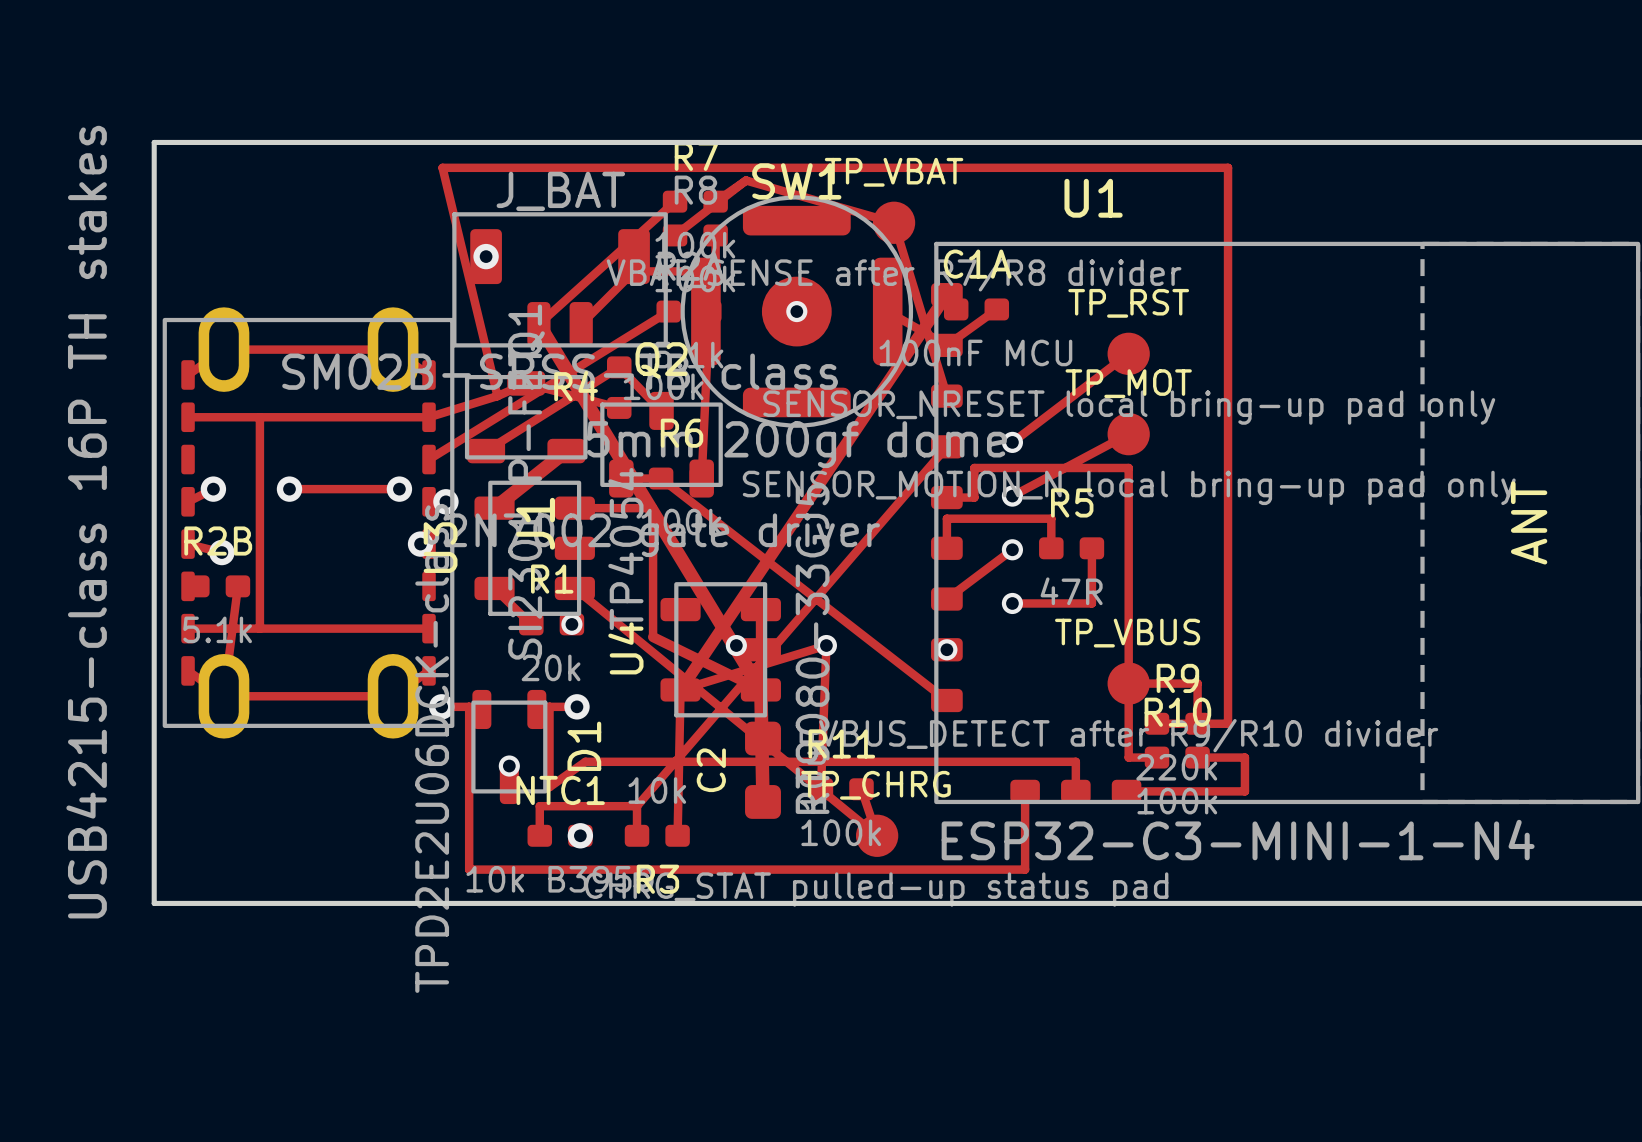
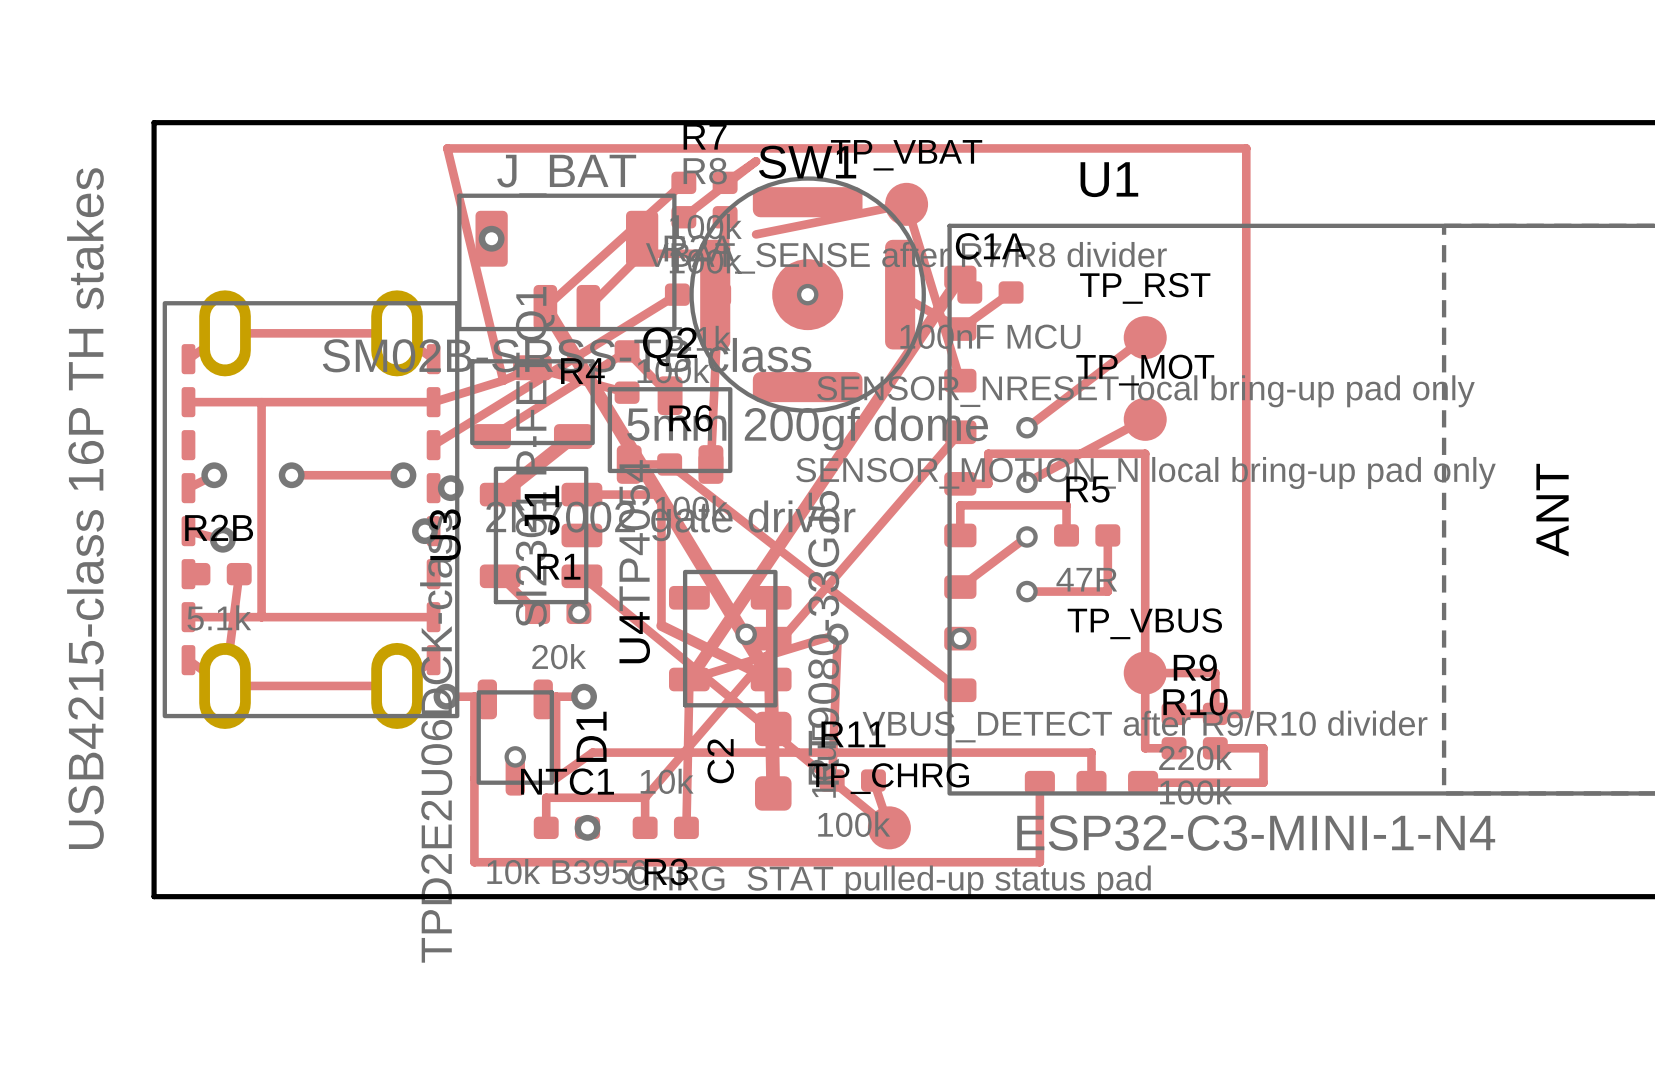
track: (746, 180) (894, 222) -> (756, 234) (906, 204)

